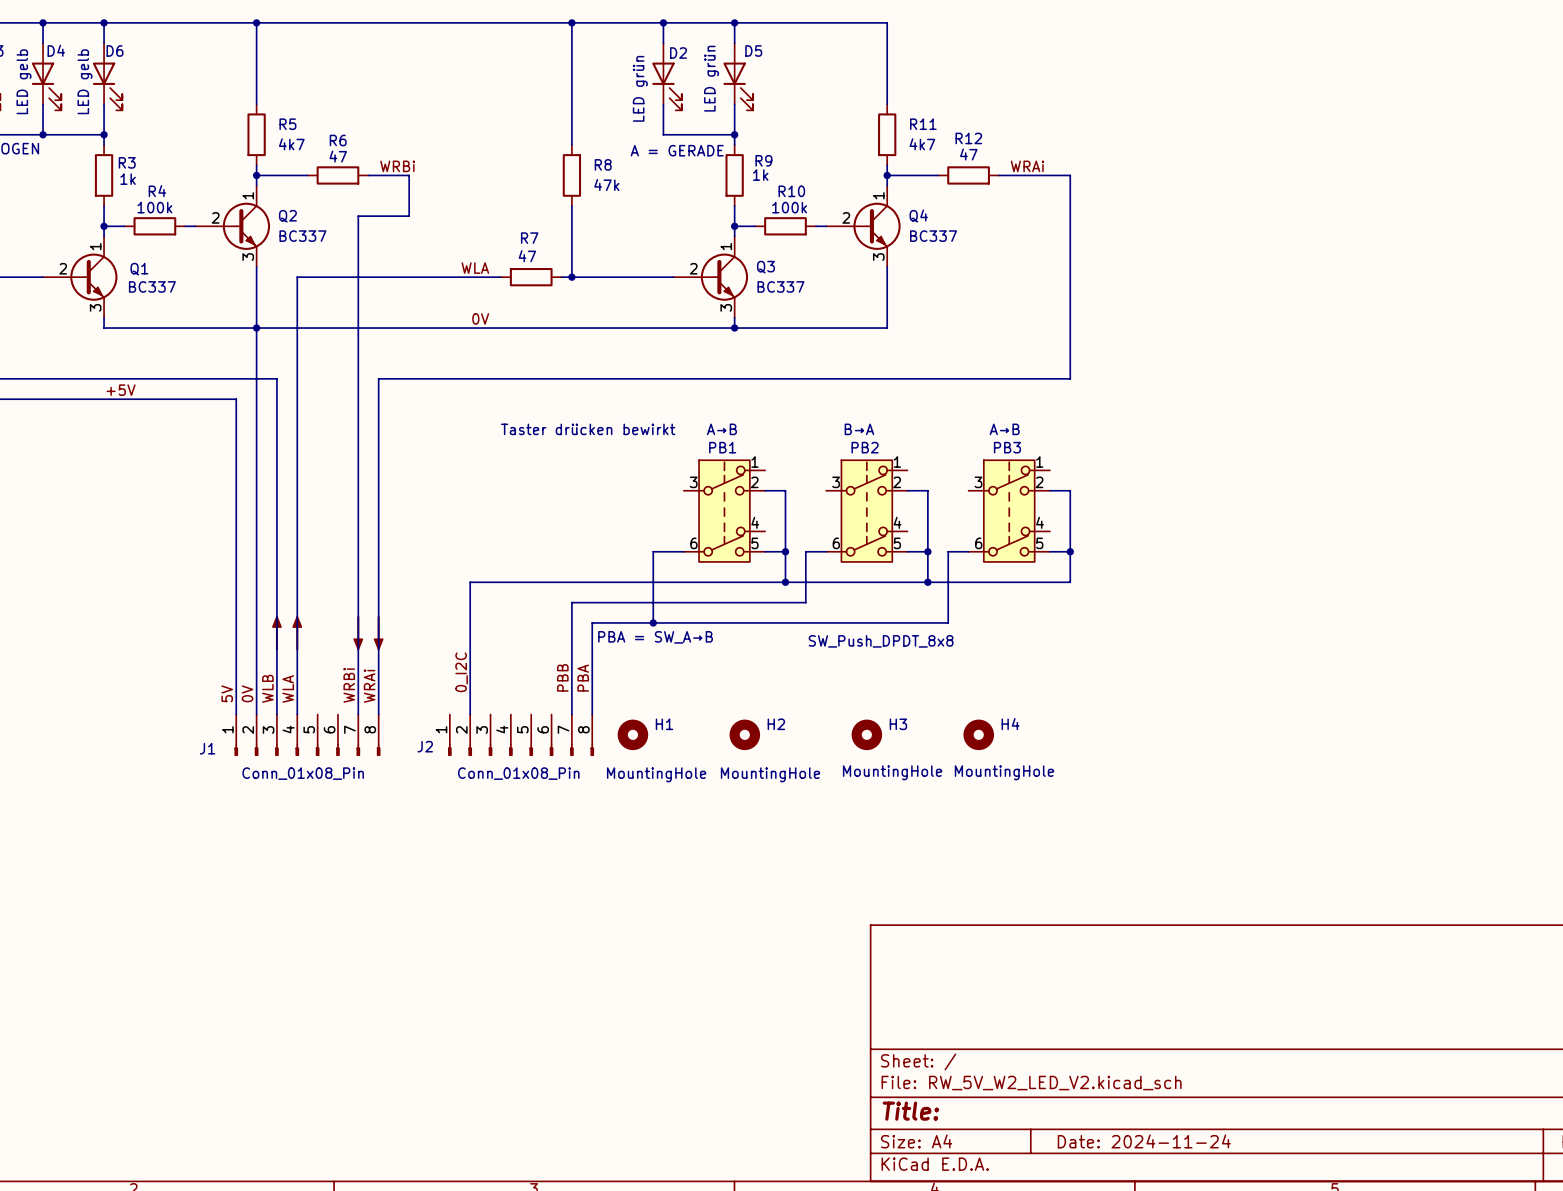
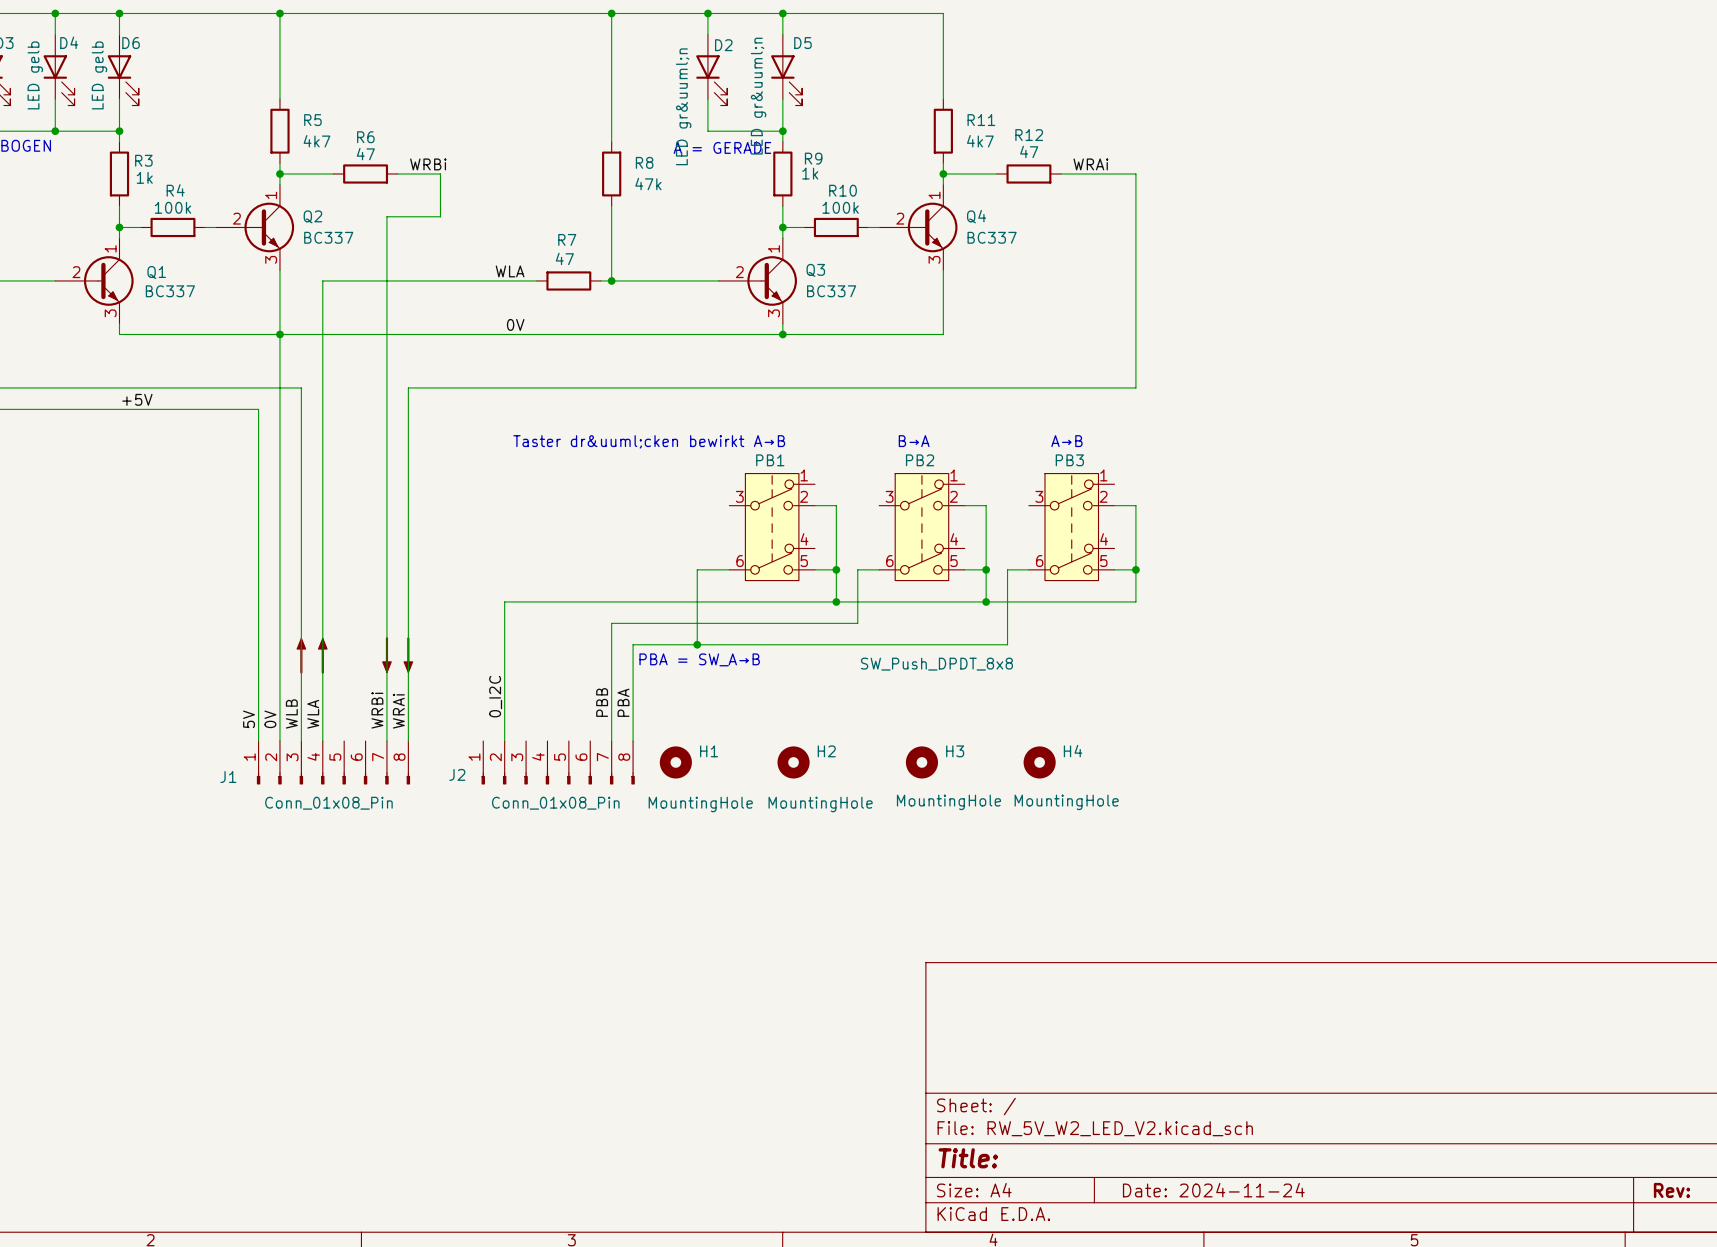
D5 value: LED grün (711, 78) -> LED gr&uuml;n (758, 96)
D2 value: LED grün (640, 88) -> LED gr&uuml;n (683, 106)
text: Taster drücken bewirkt (588, 429) -> Taster dr&uuml;cken bewirkt (628, 441)

